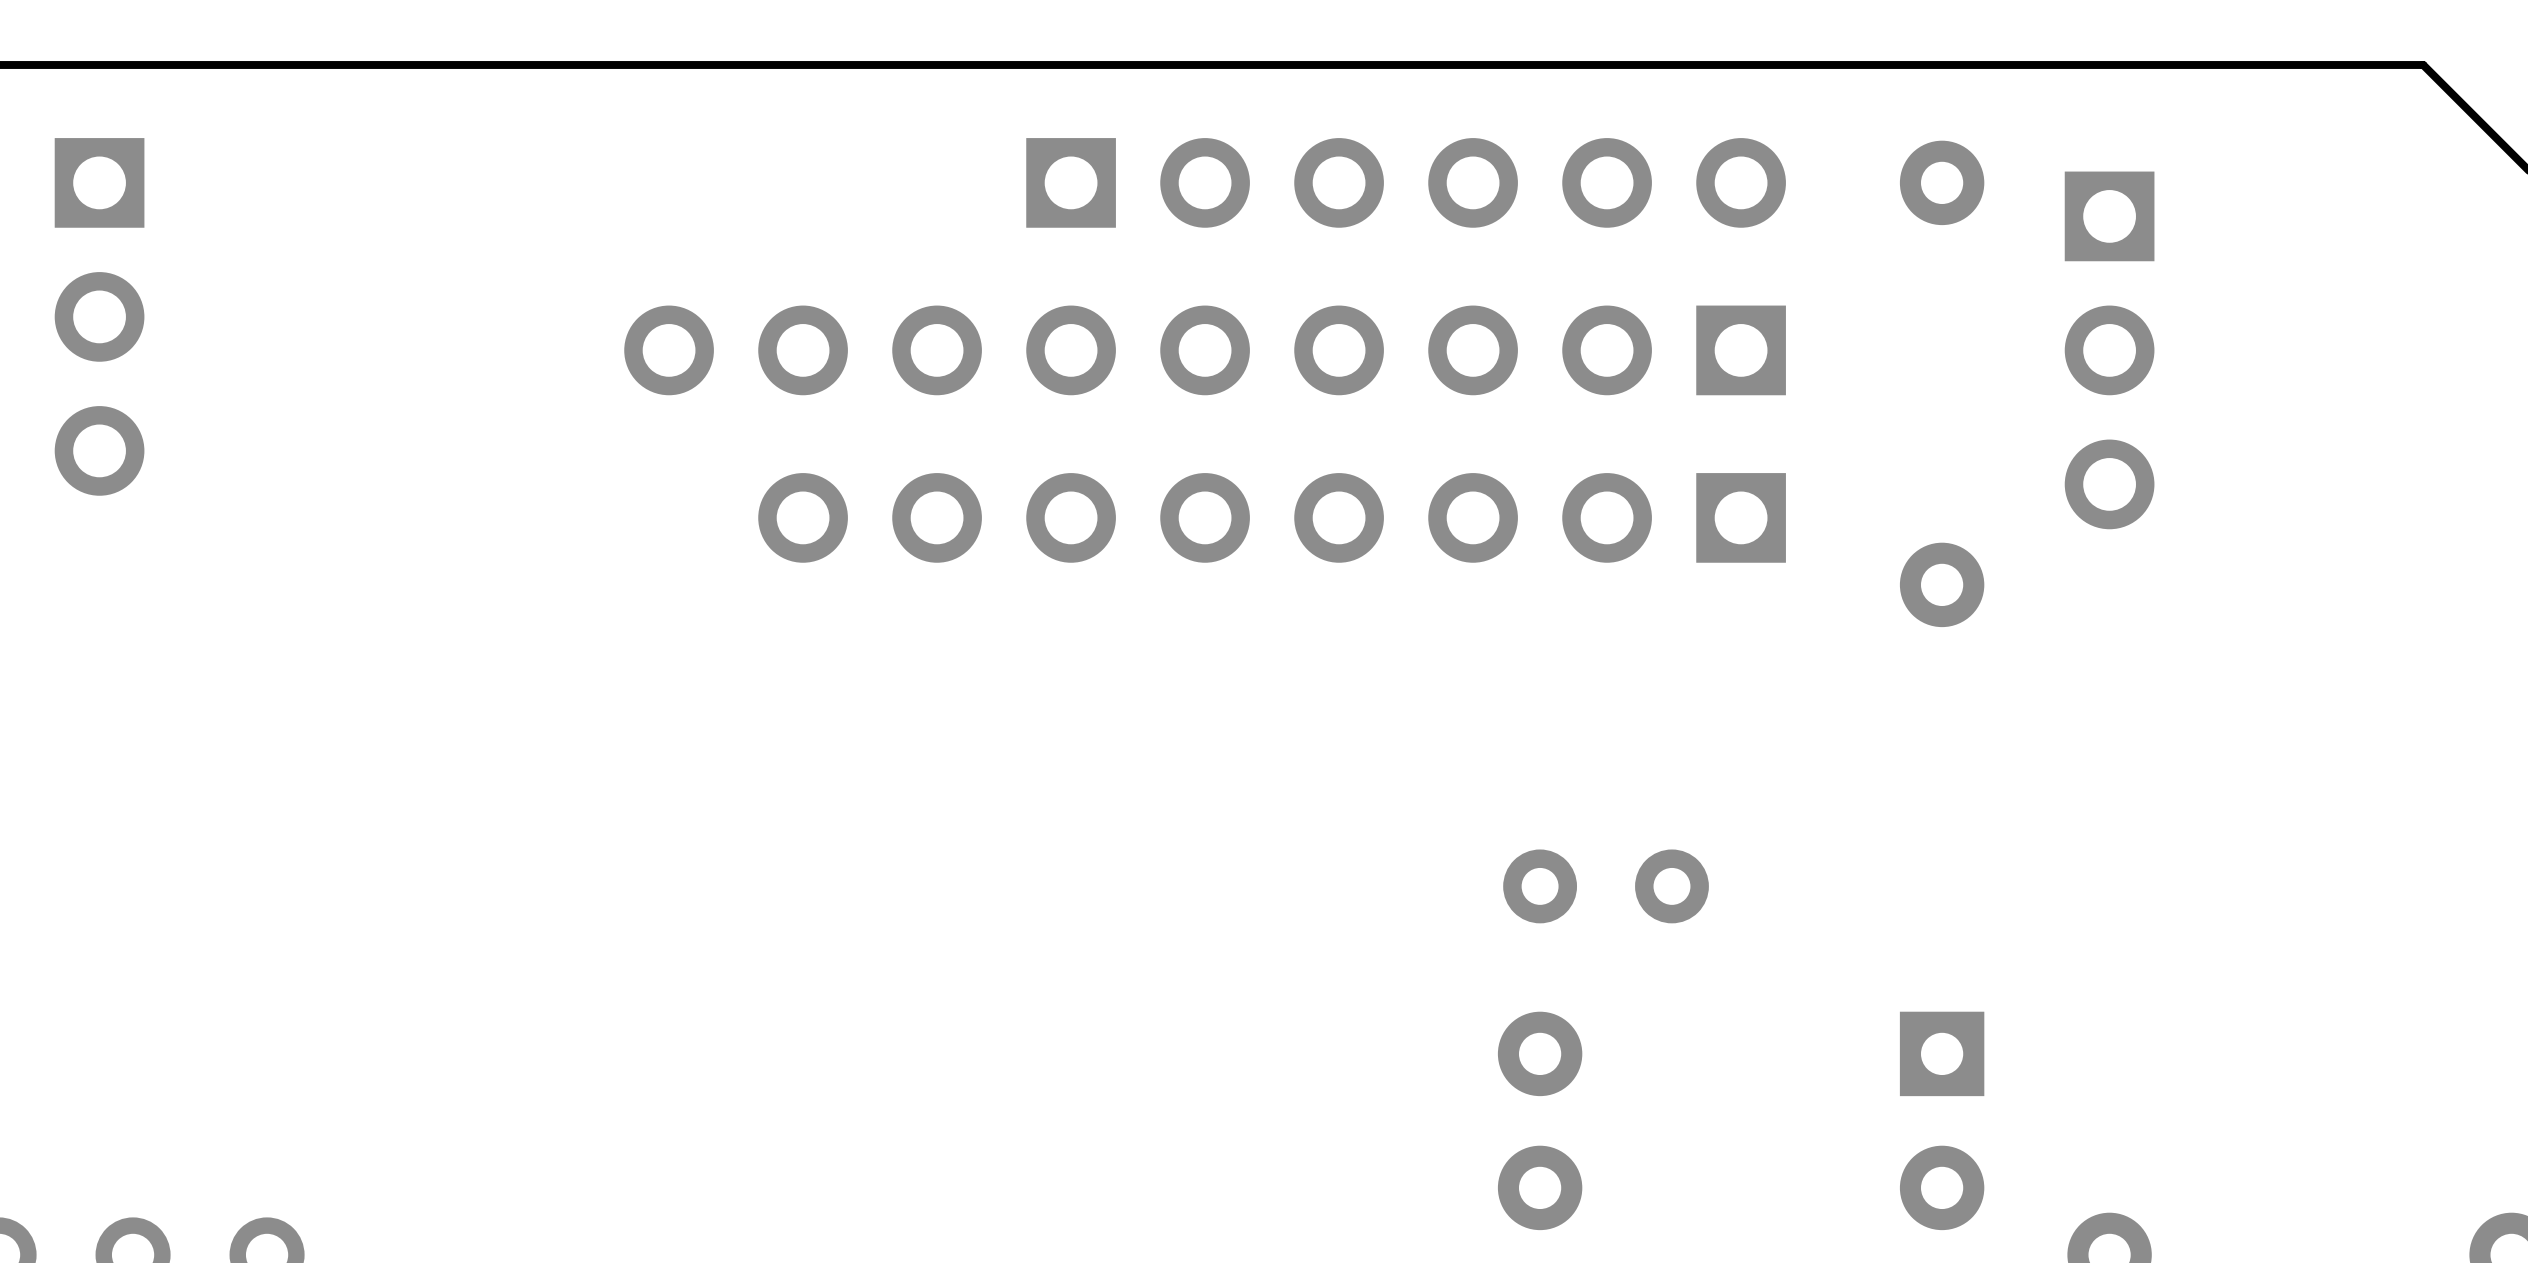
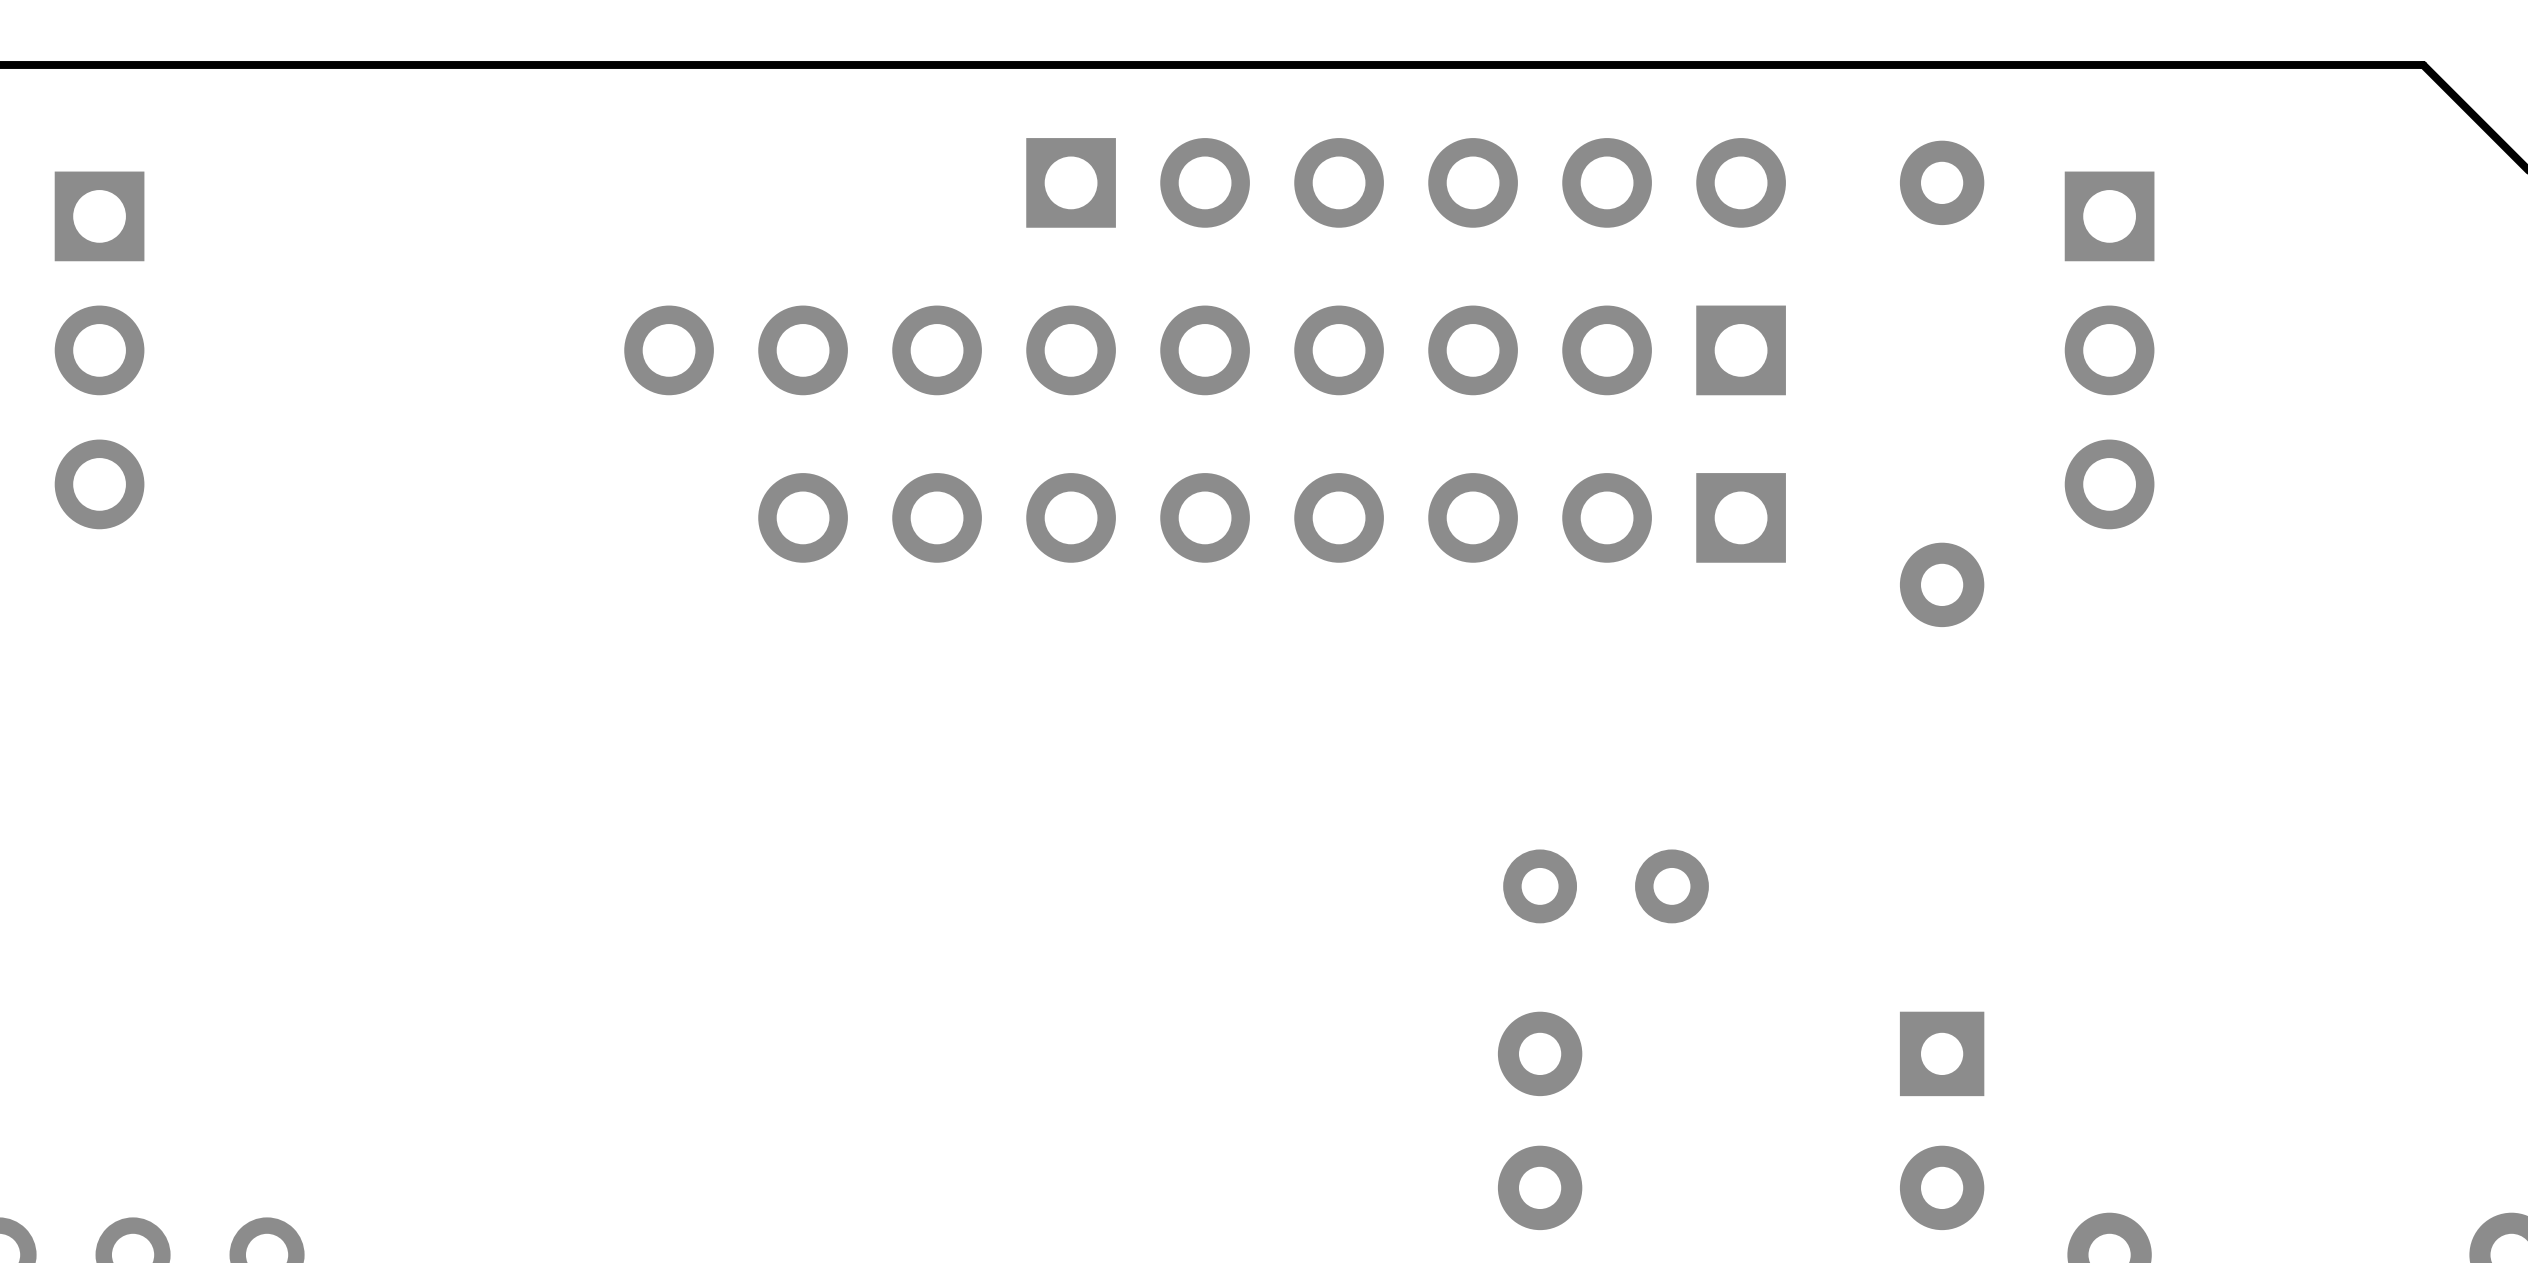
part position: (99, 316) -> (99, 350)

